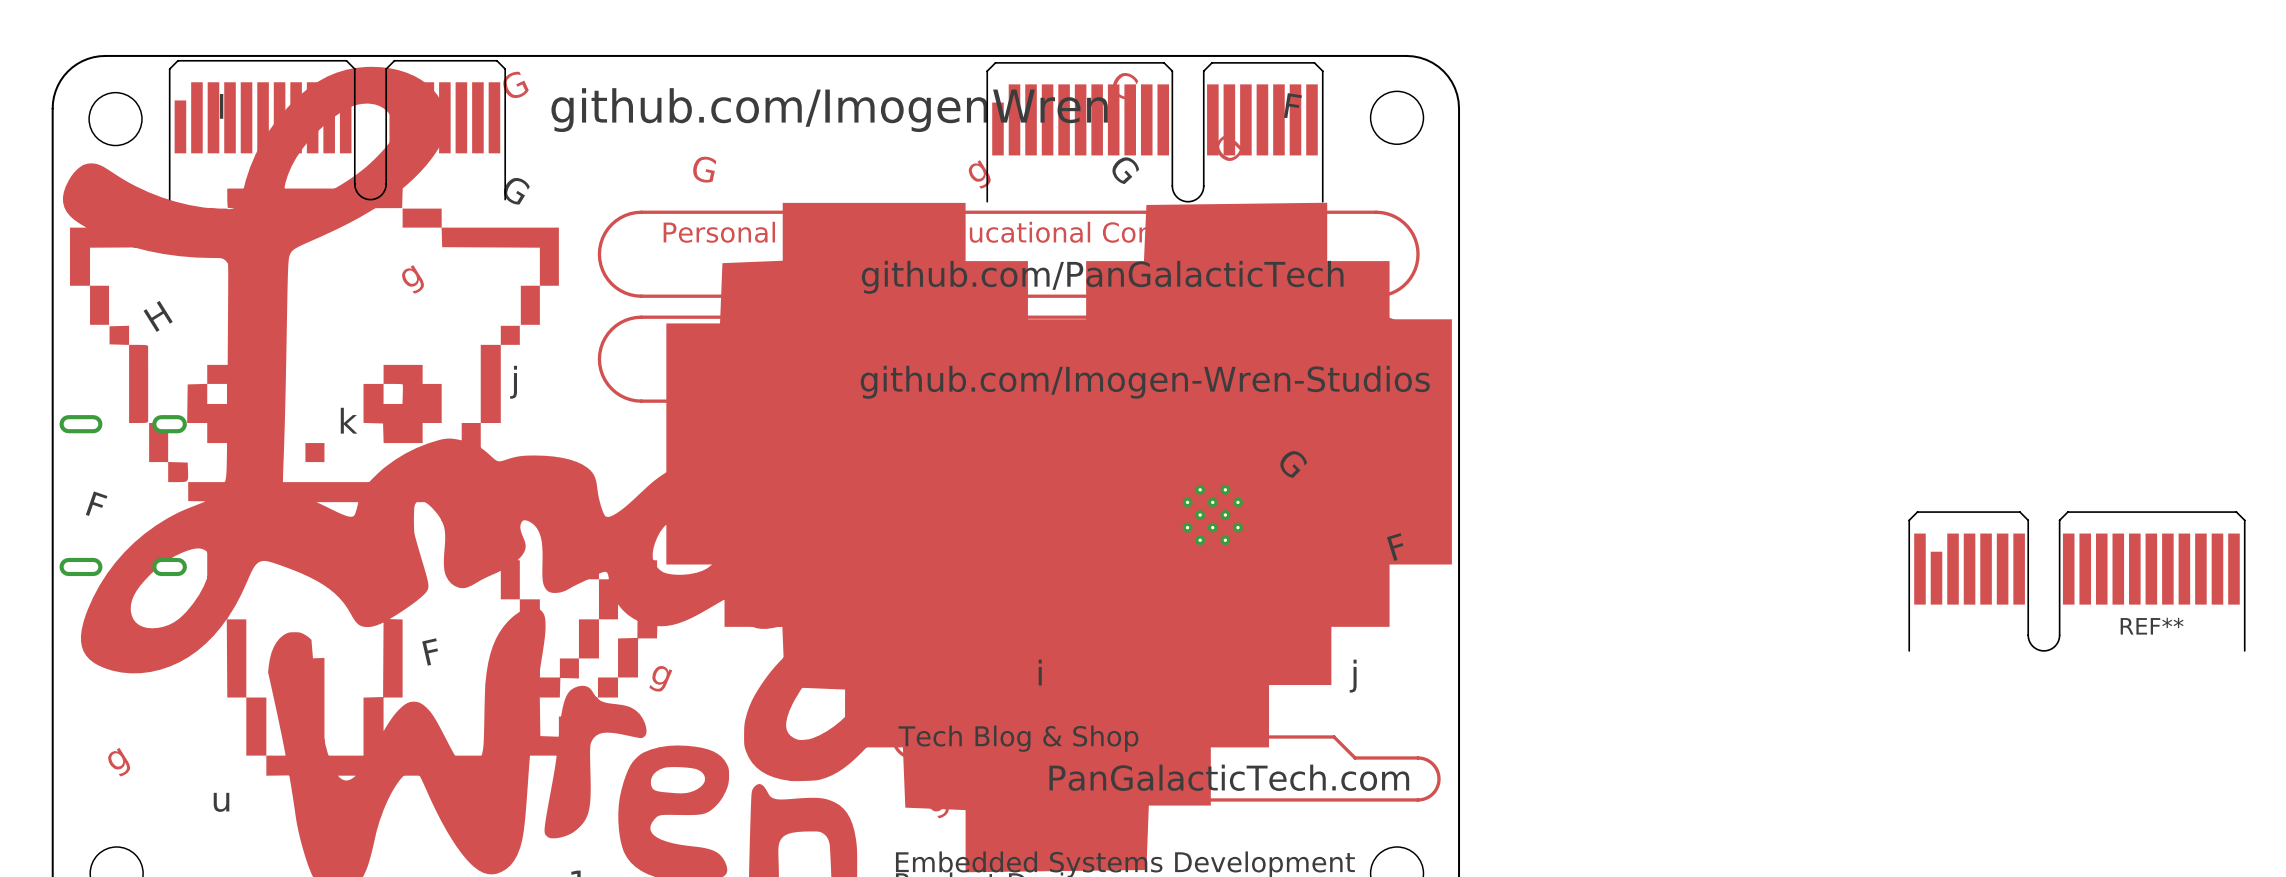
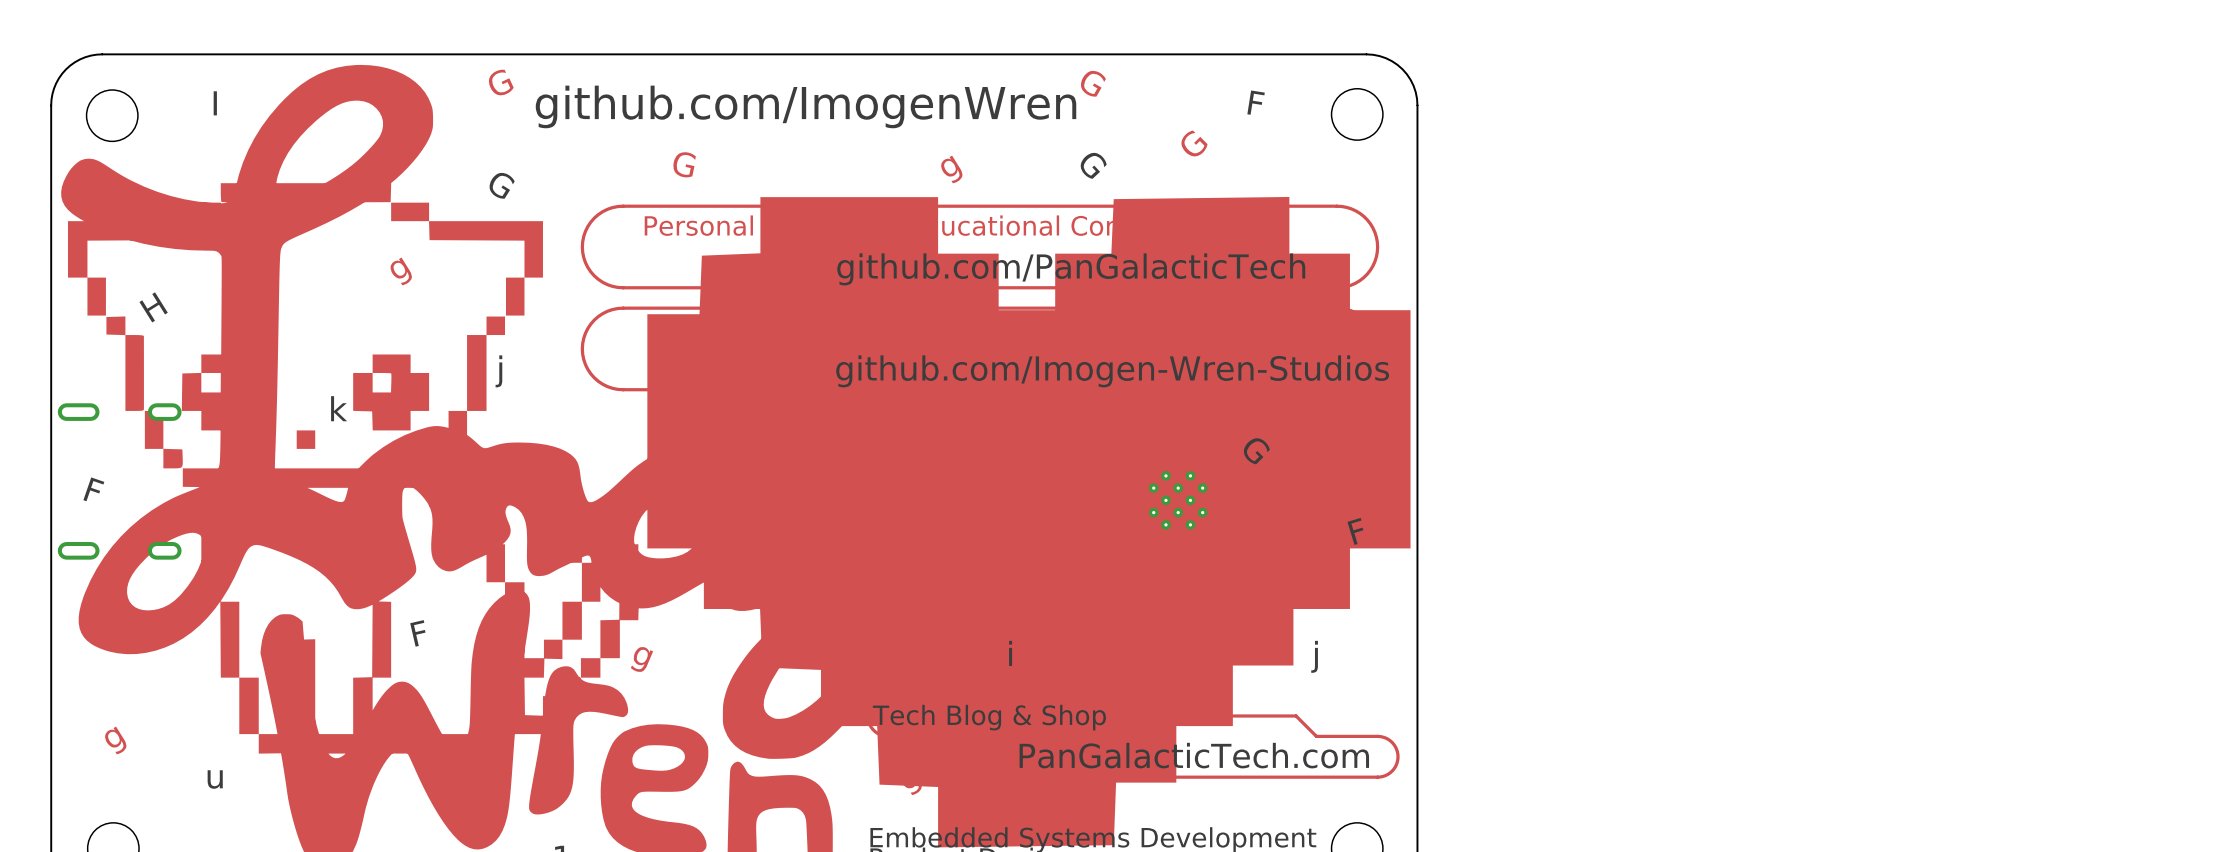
part: (337, 130) -> none
part: (1154, 132) -> none
REF**: (2076, 581) -> none

